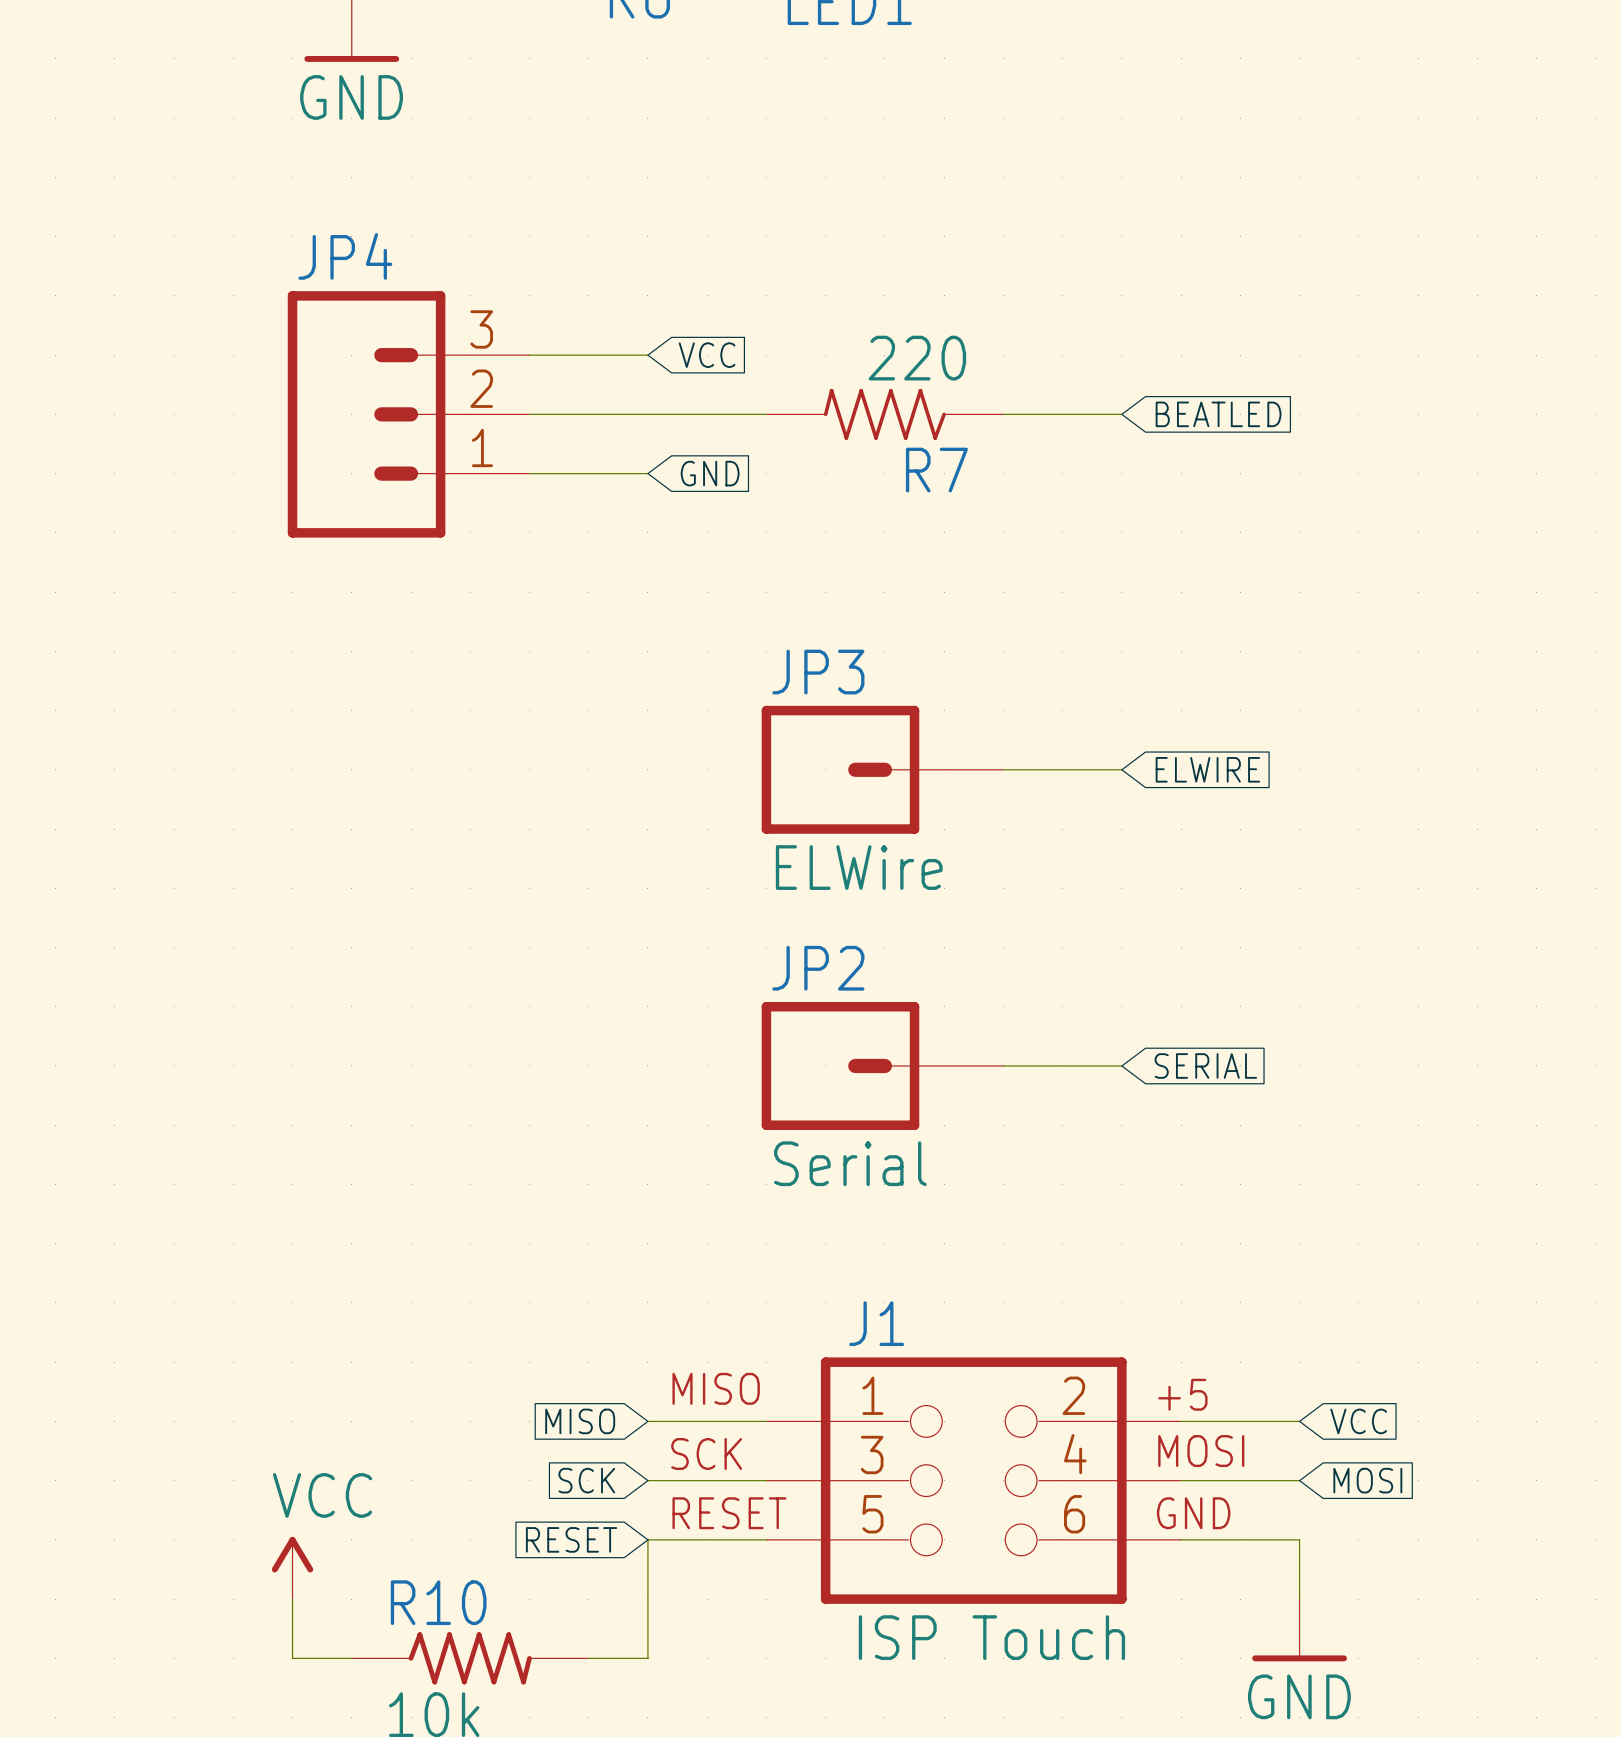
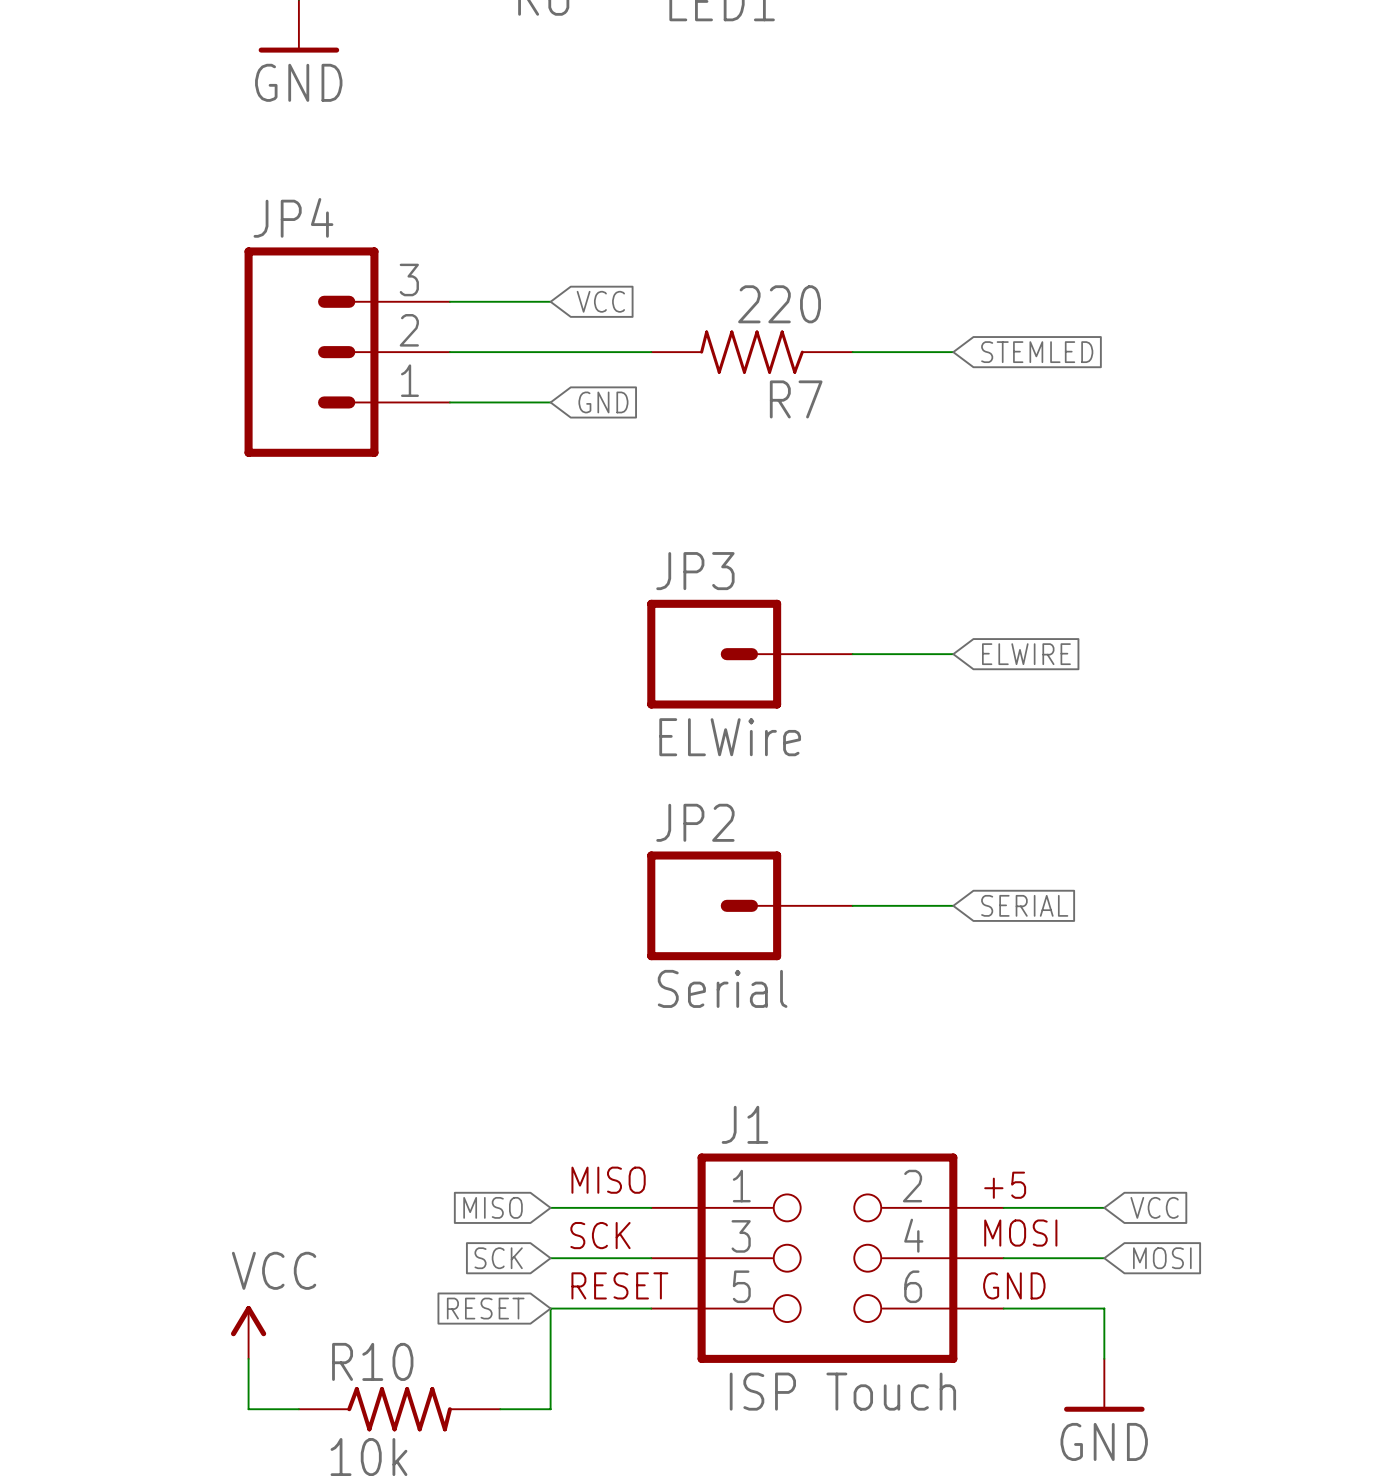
global label: BEATLED (1218, 414) -> STEMLED (1037, 352)

